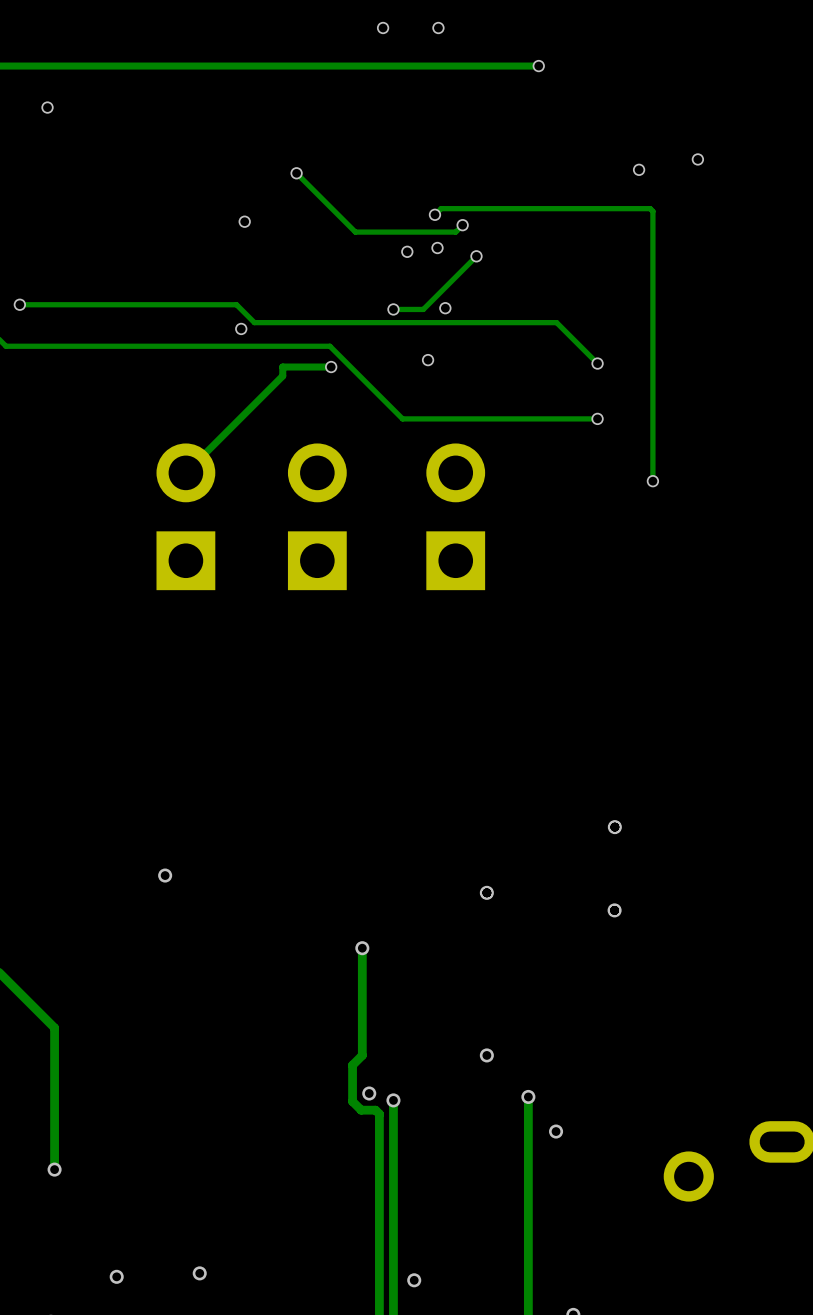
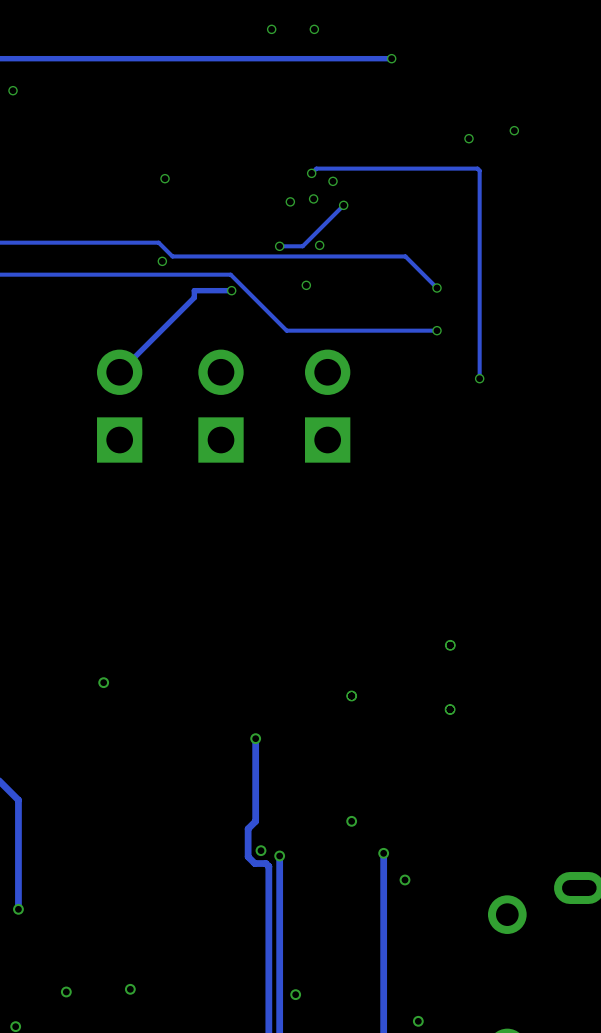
track: (296, 173) (355, 232) (455, 232) (462, 225) -> none
via: (296, 173) -> none

